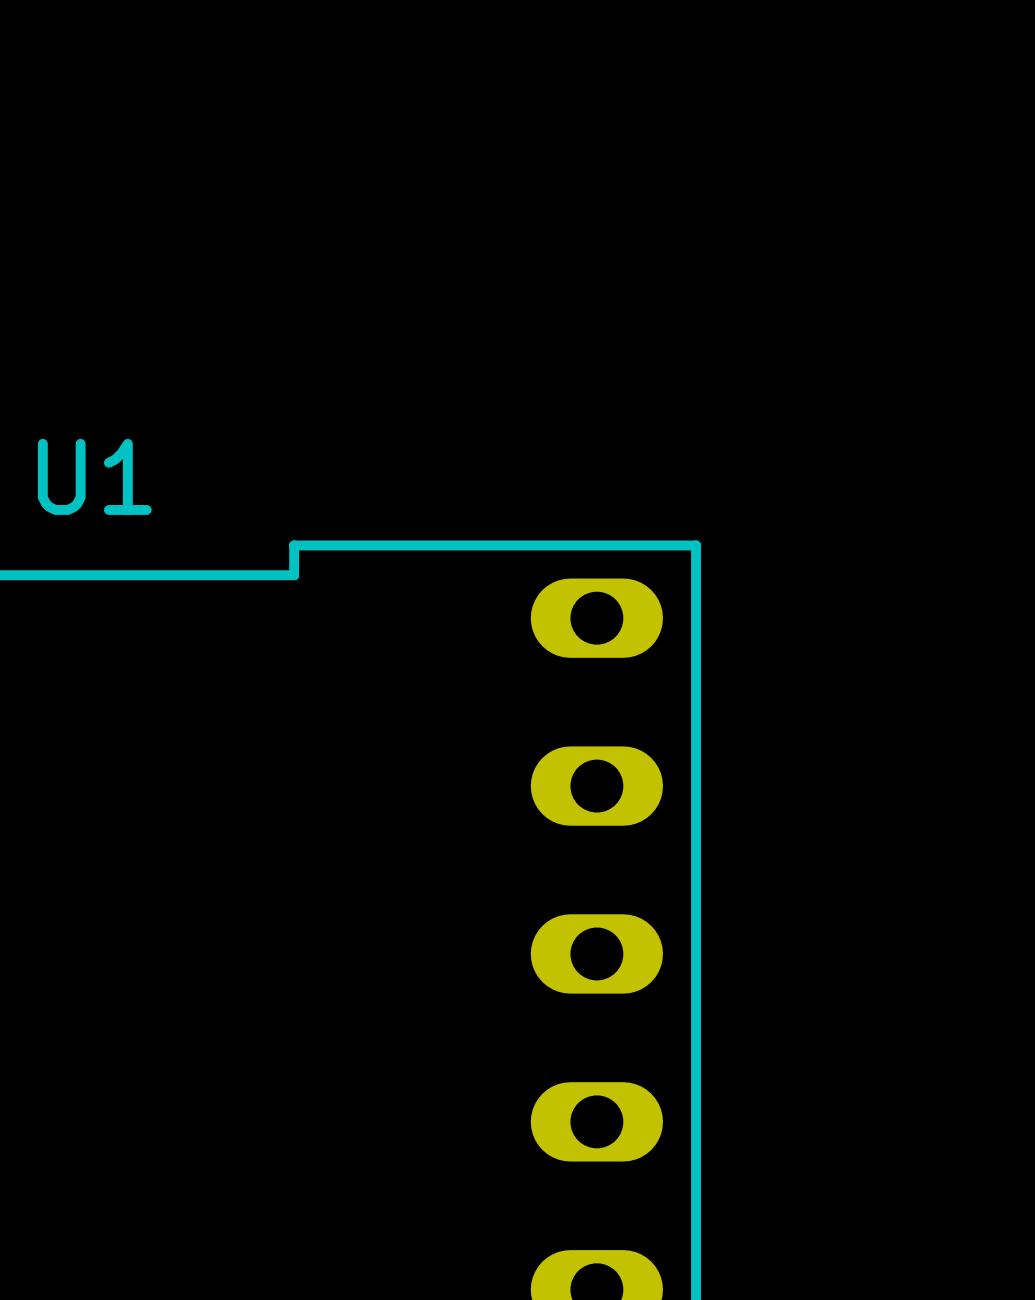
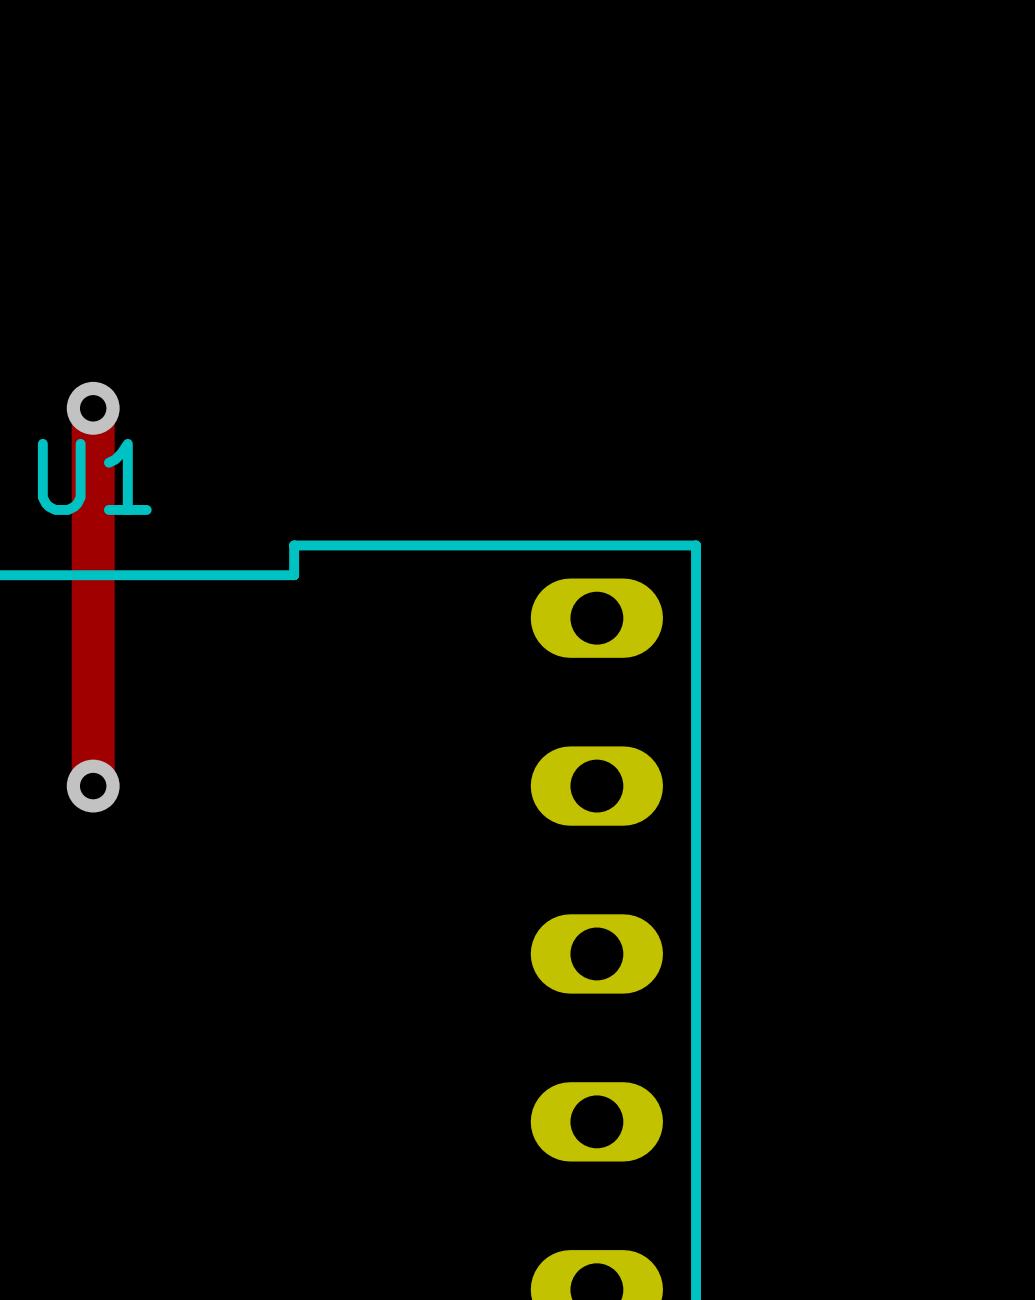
track: none -> (93, 408) (93, 786)
via: none -> (93, 408)
via: none -> (93, 786)

